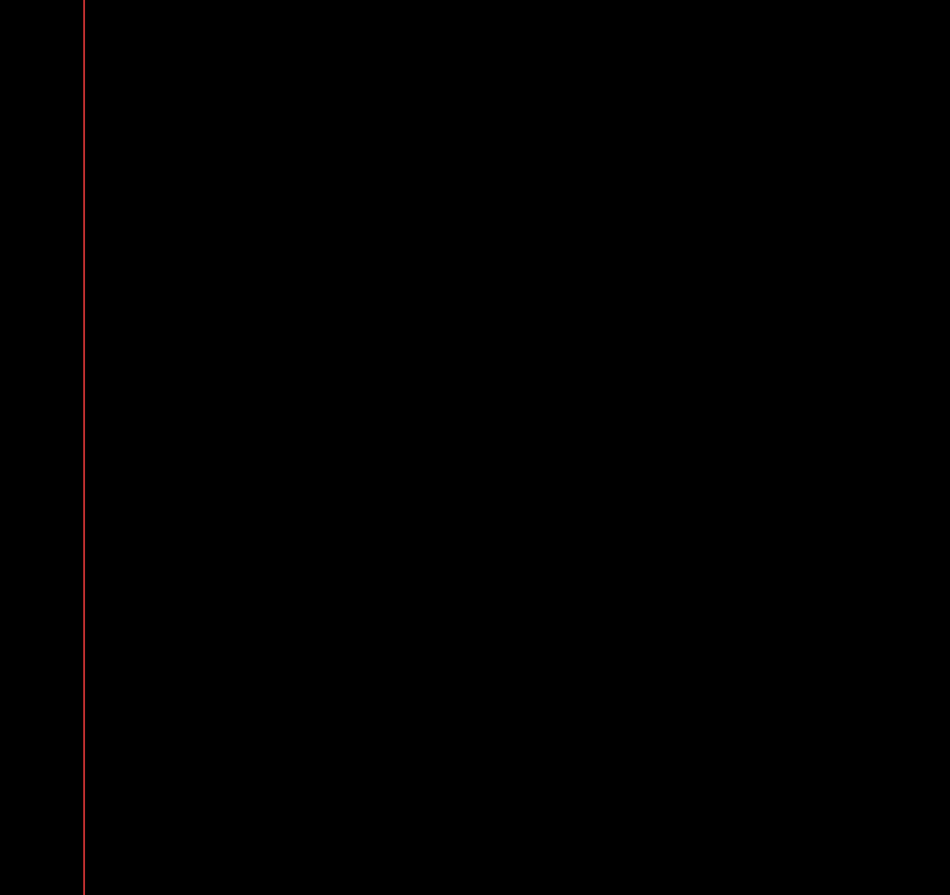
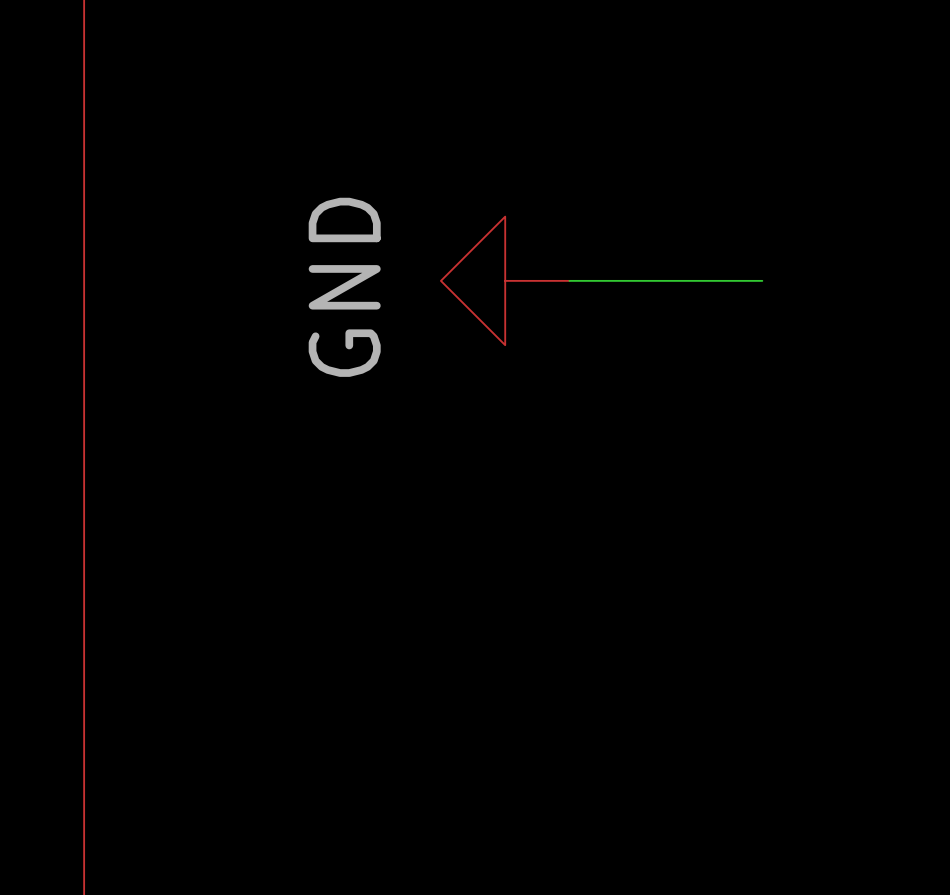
power symbol: none -> GND (505, 280)
wire: none -> (569, 280) (762, 280)

